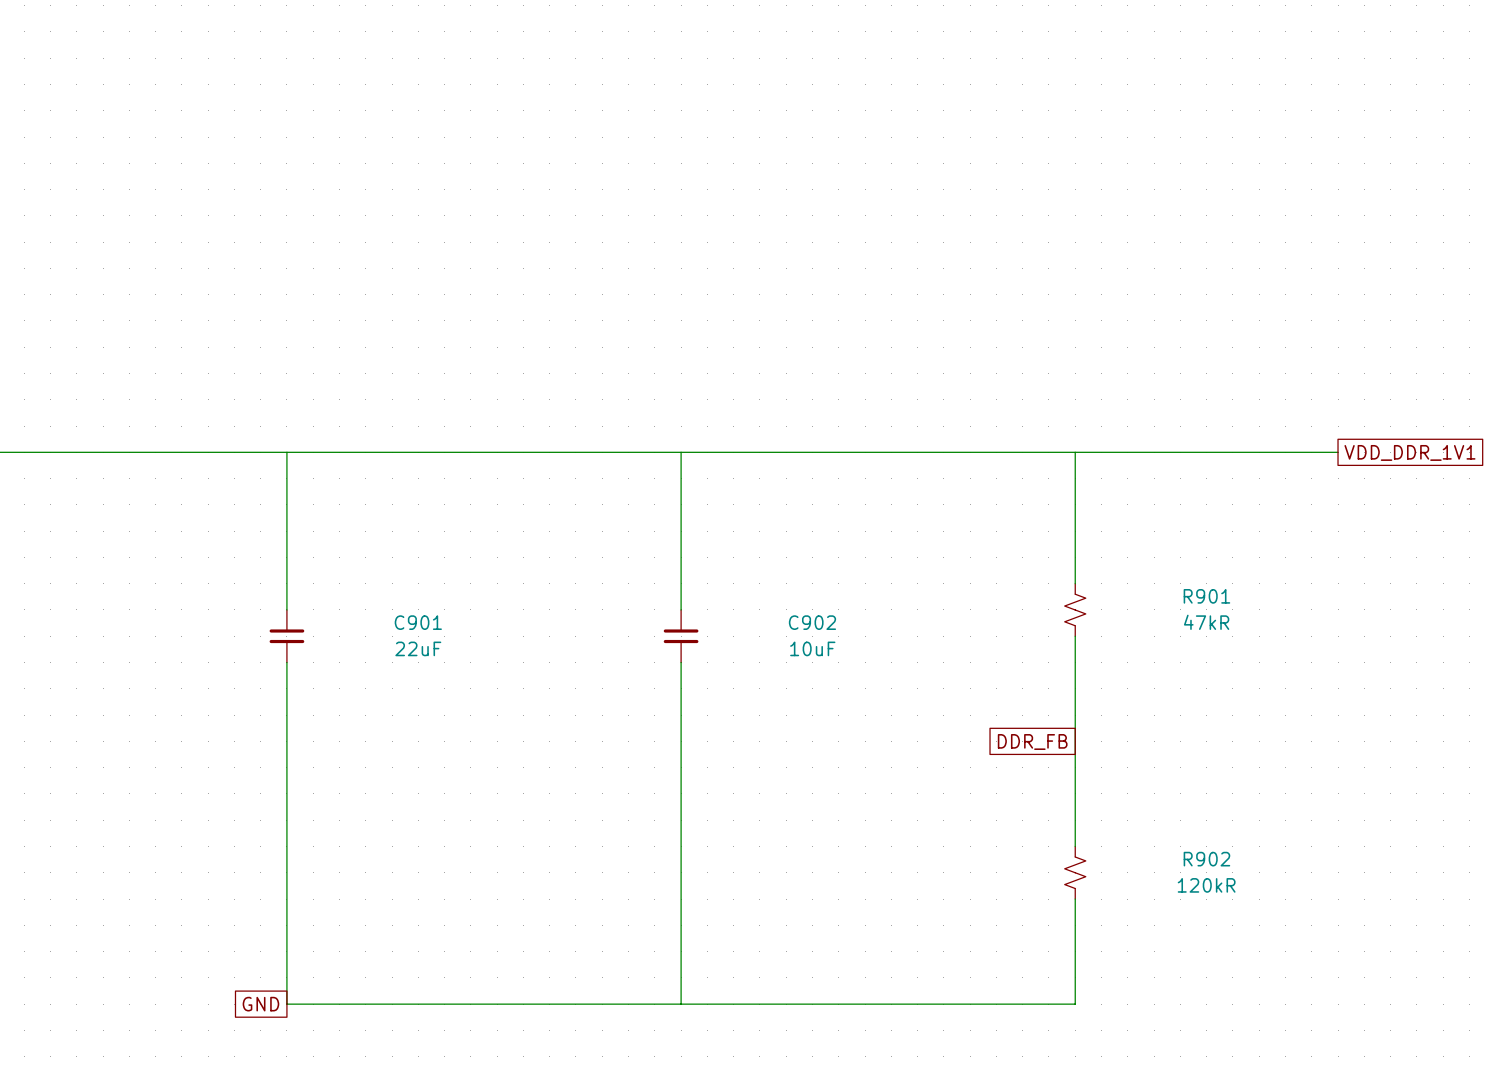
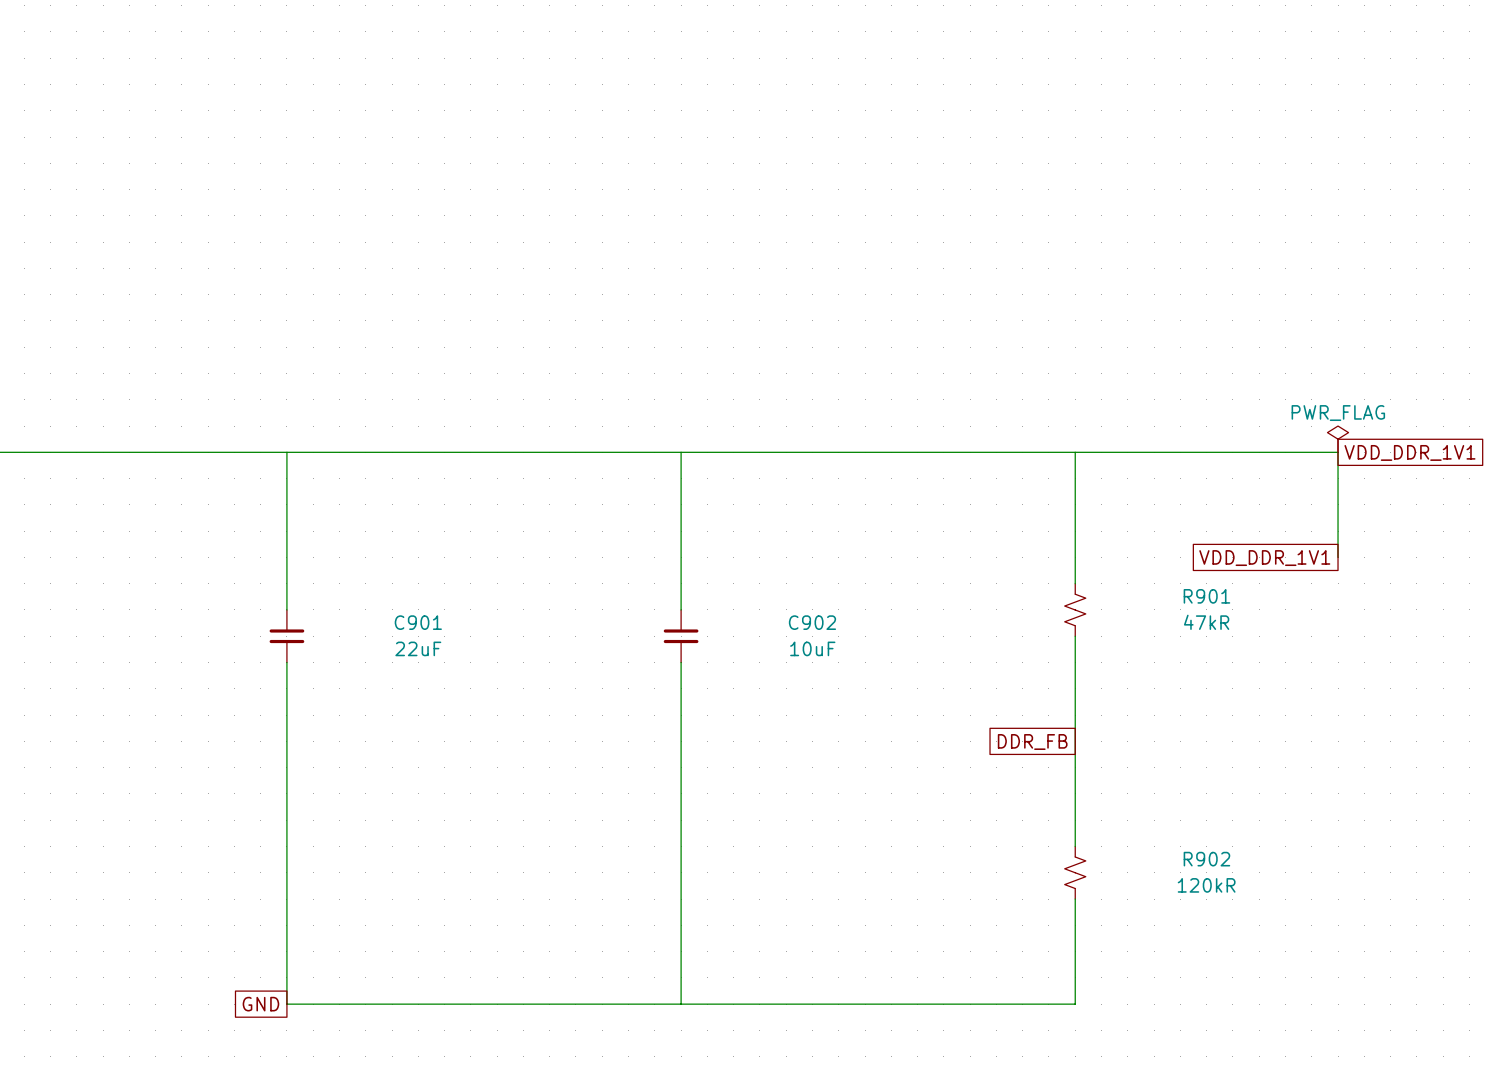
power symbol: none -> PWR_FLAG (1338, 439)
wire: none -> (1338, 452) (1338, 557)
global label: none -> VDD_DDR_1V1 (1264, 558)

